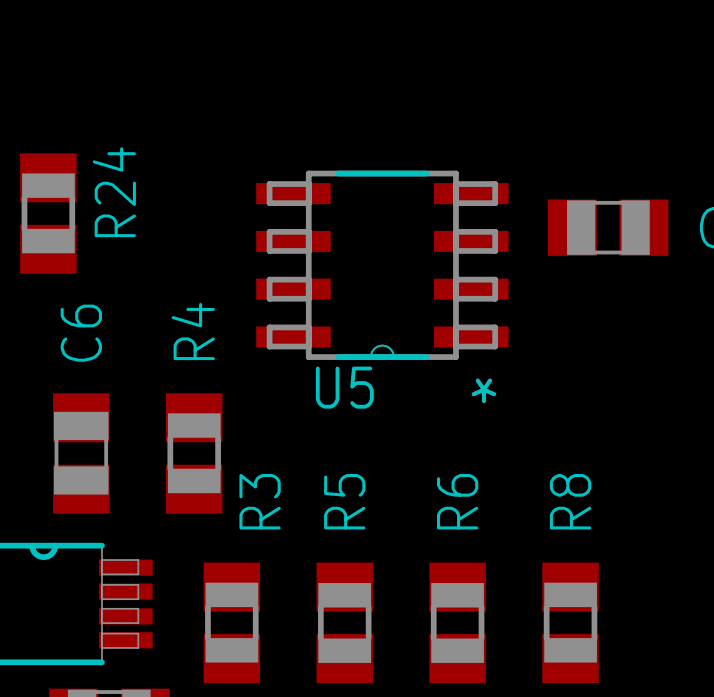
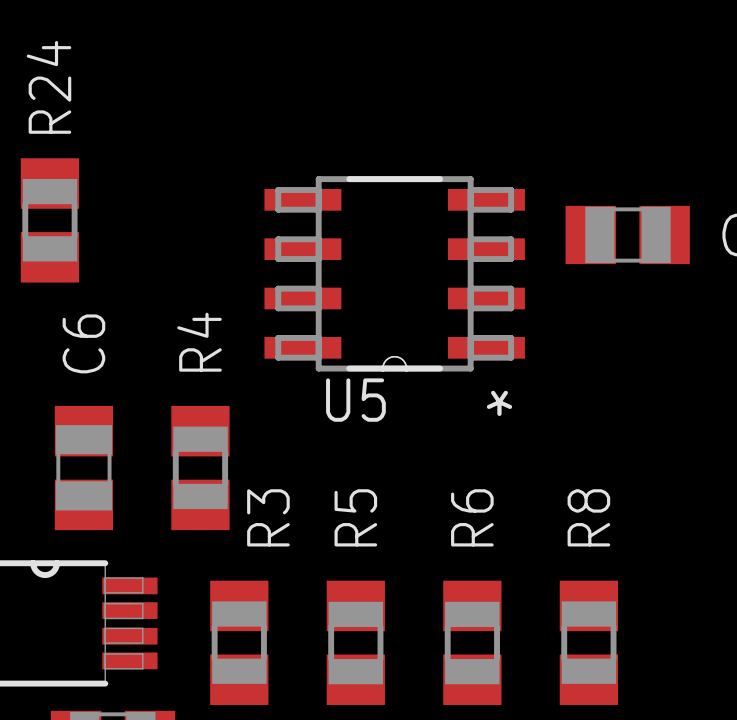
R24 name position: R24 (114, 192) -> R24 (49, 87)

